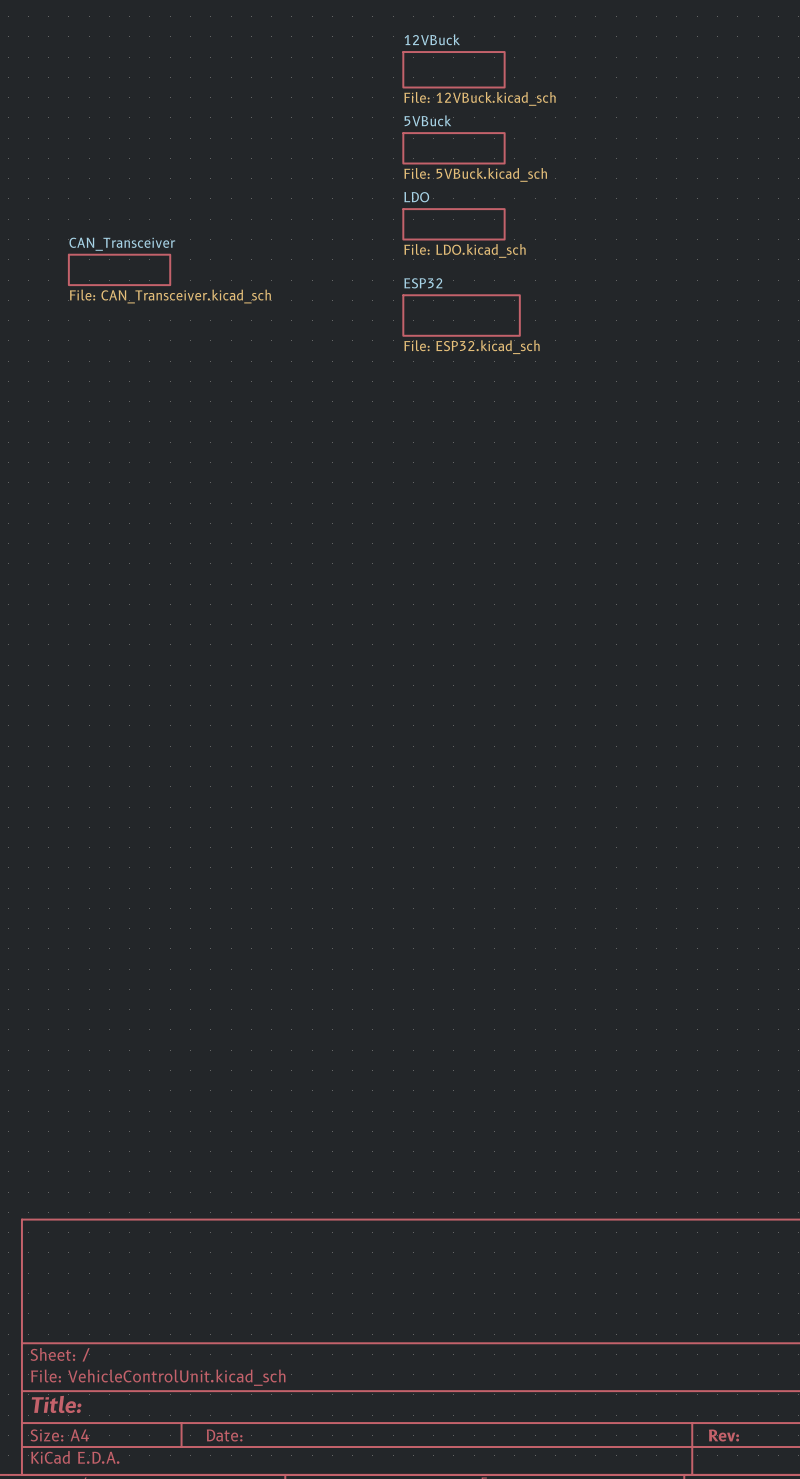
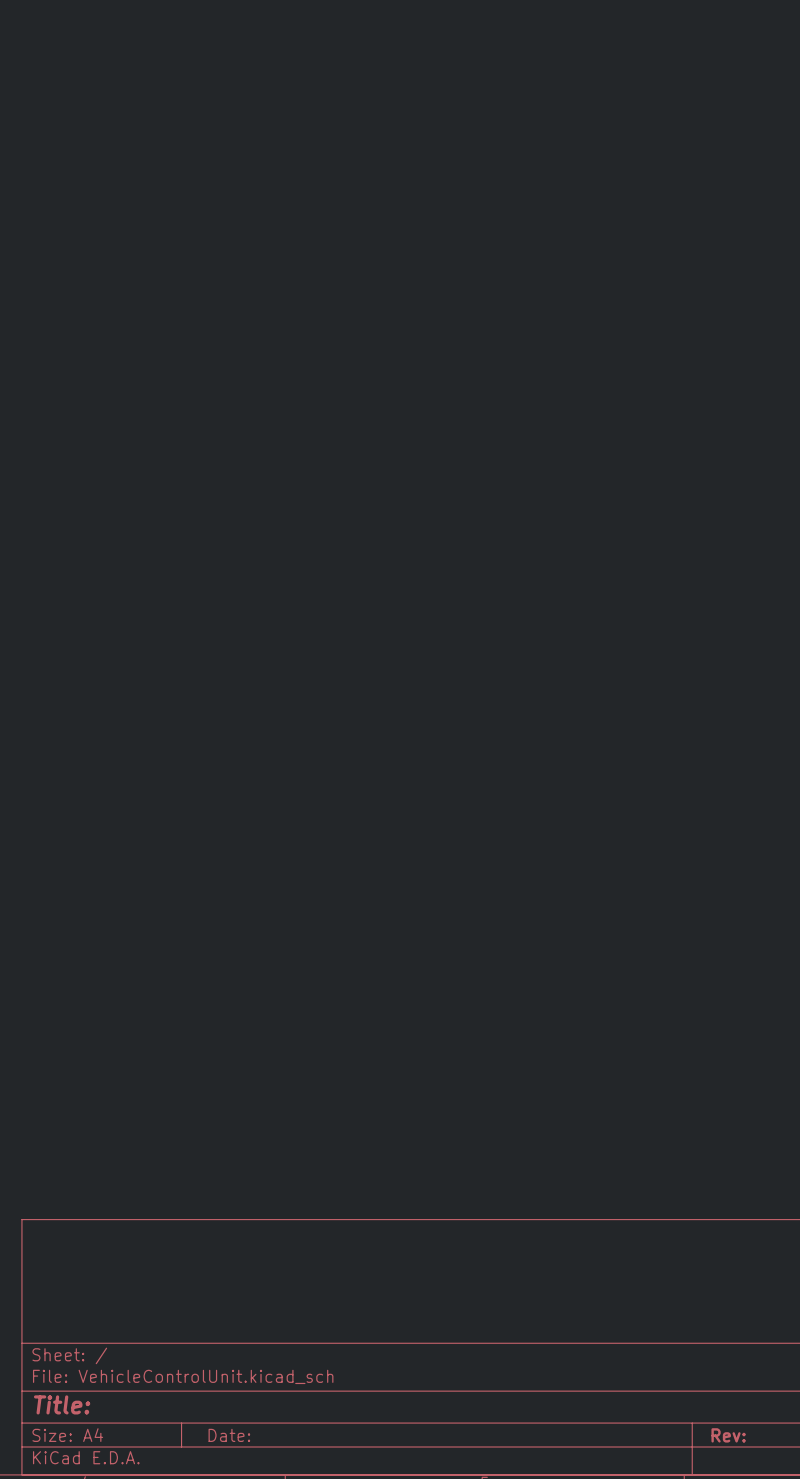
sheet 12VBuck: File: 12VBuck.kicad_sch (453, 69) -> none
sheet 5VBuck: File: 5VBuck.kicad_sch (453, 148) -> none
sheet LDO: File: LDO.kicad_sch (453, 224) -> none
sheet CAN_Transceiver: File: CAN_Transceiver.kicad_sch (119, 269) -> none
sheet ESP32: File: ESP32.kicad_sch (461, 315) -> none

